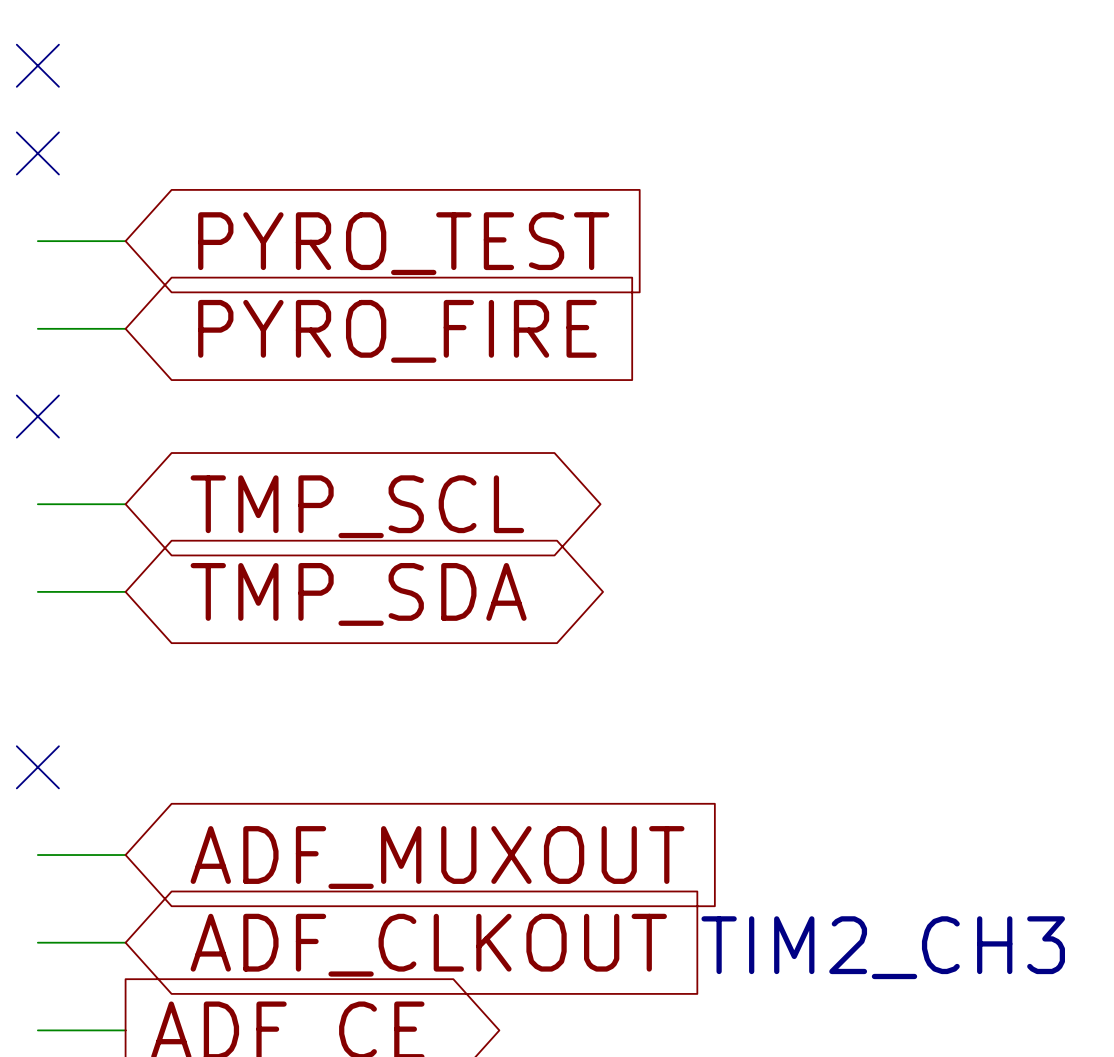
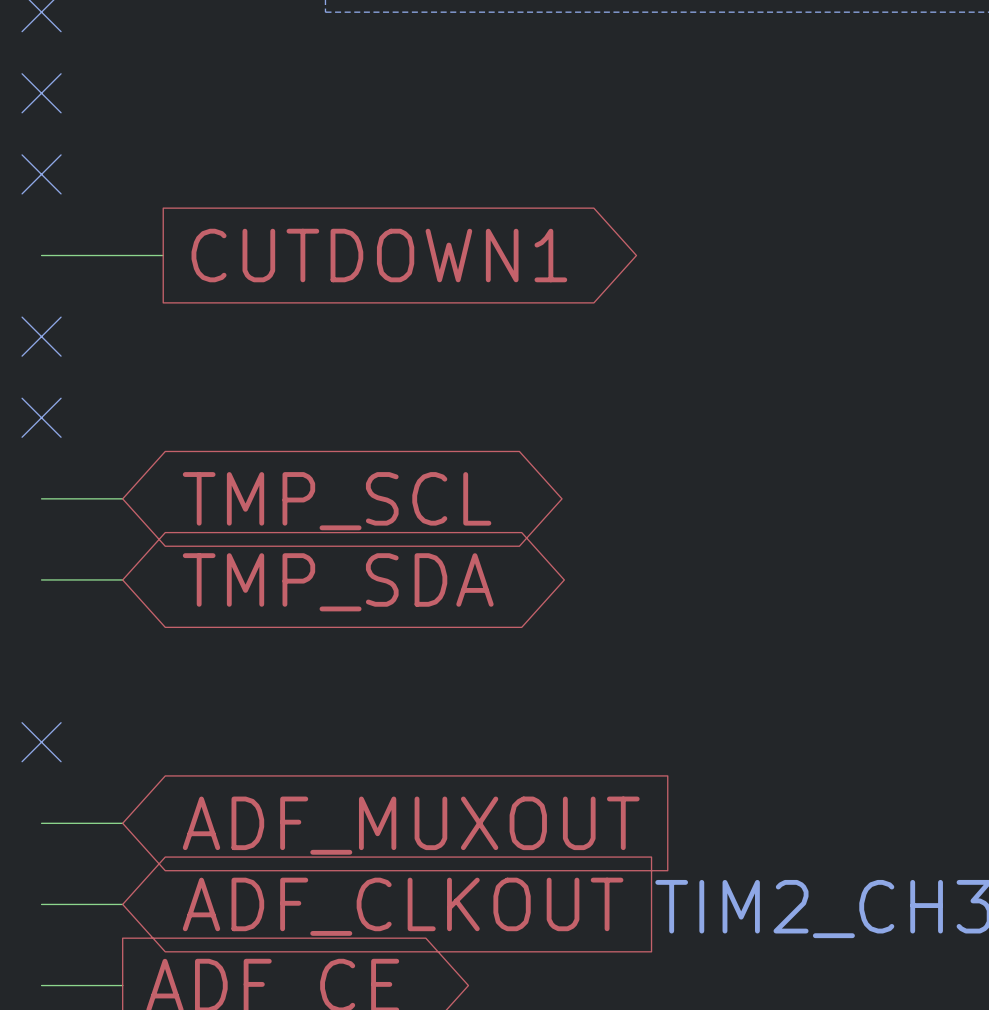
wire: none -> (122, 255) (163, 255)
global label: none -> CUTDOWN1 (379, 255)
global label: PYRO_TEST (403, 243) -> none
wire: (37, 328) (125, 328) -> none
no-connect mark: none -> (41, 336)
global label: PYRO_FIRE (397, 331) -> none

